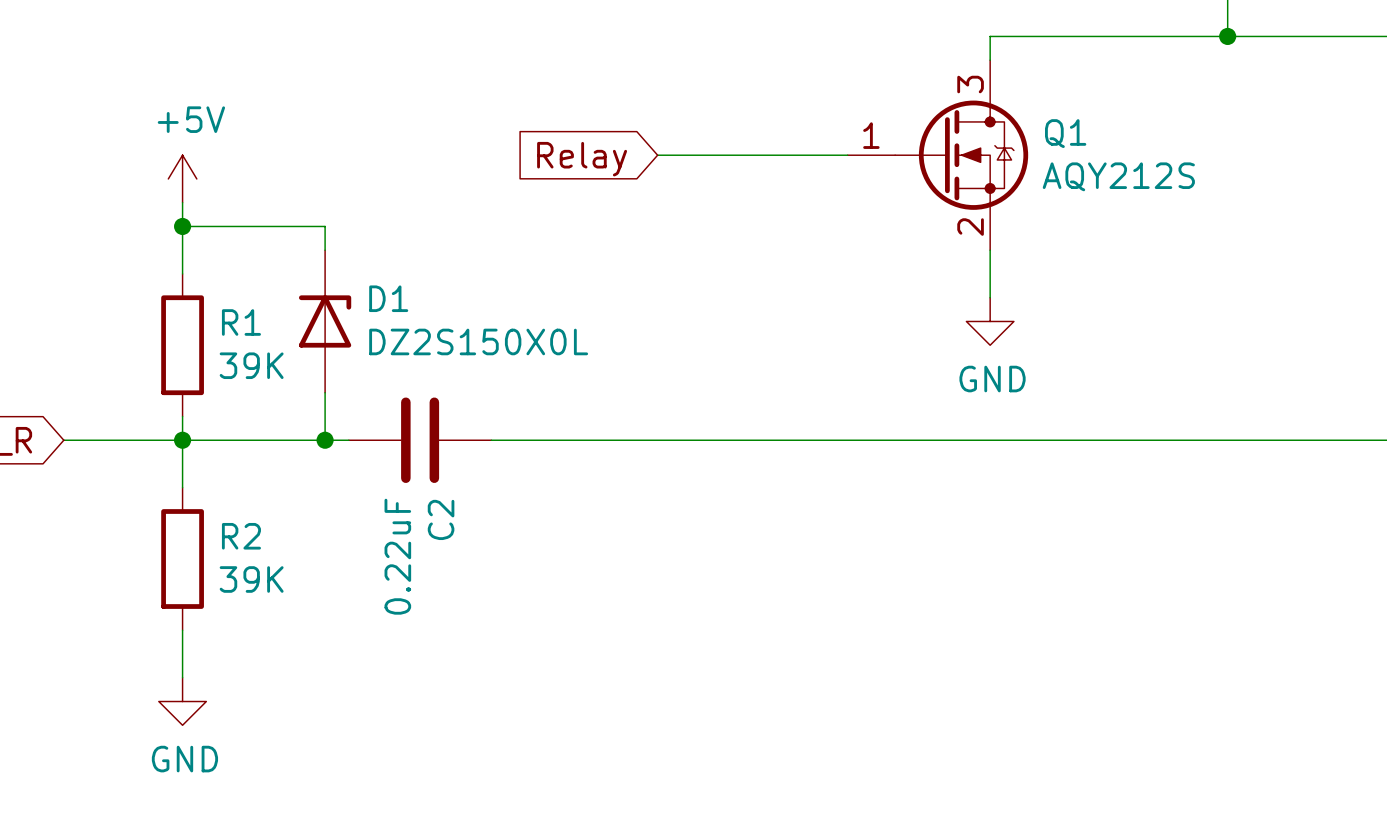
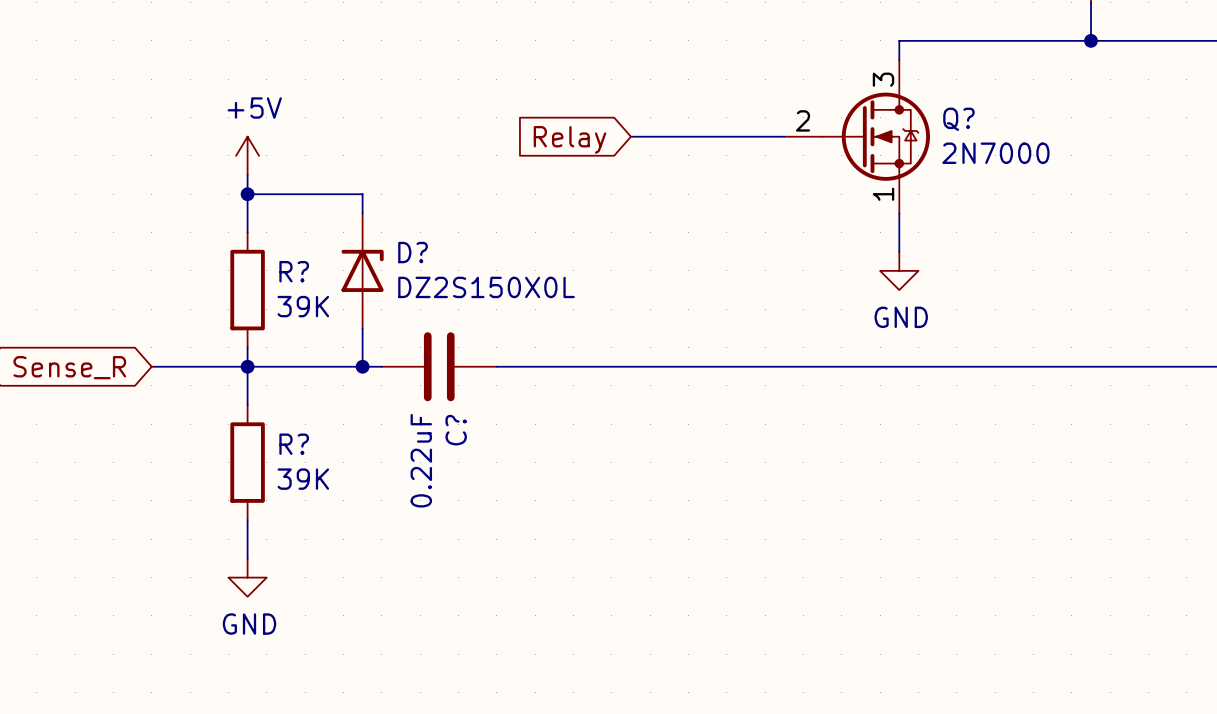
Q1 name: Q1 (1065, 133) -> Q? (958, 119)
Q1 pin number: 1 (871, 135) -> 2 (803, 120)
Q1 value: AQY212S (1118, 176) -> 2N7000 (995, 153)
Q1 pin number: 2 (970, 227) -> 1 (883, 194)
D1 name: D1 (388, 298) -> D? (413, 252)
R1 name: R1 (241, 322) -> R? (294, 271)
C2 name: C2 (441, 519) -> C? (456, 430)
R2 name: R2 (241, 536) -> R? (294, 444)

